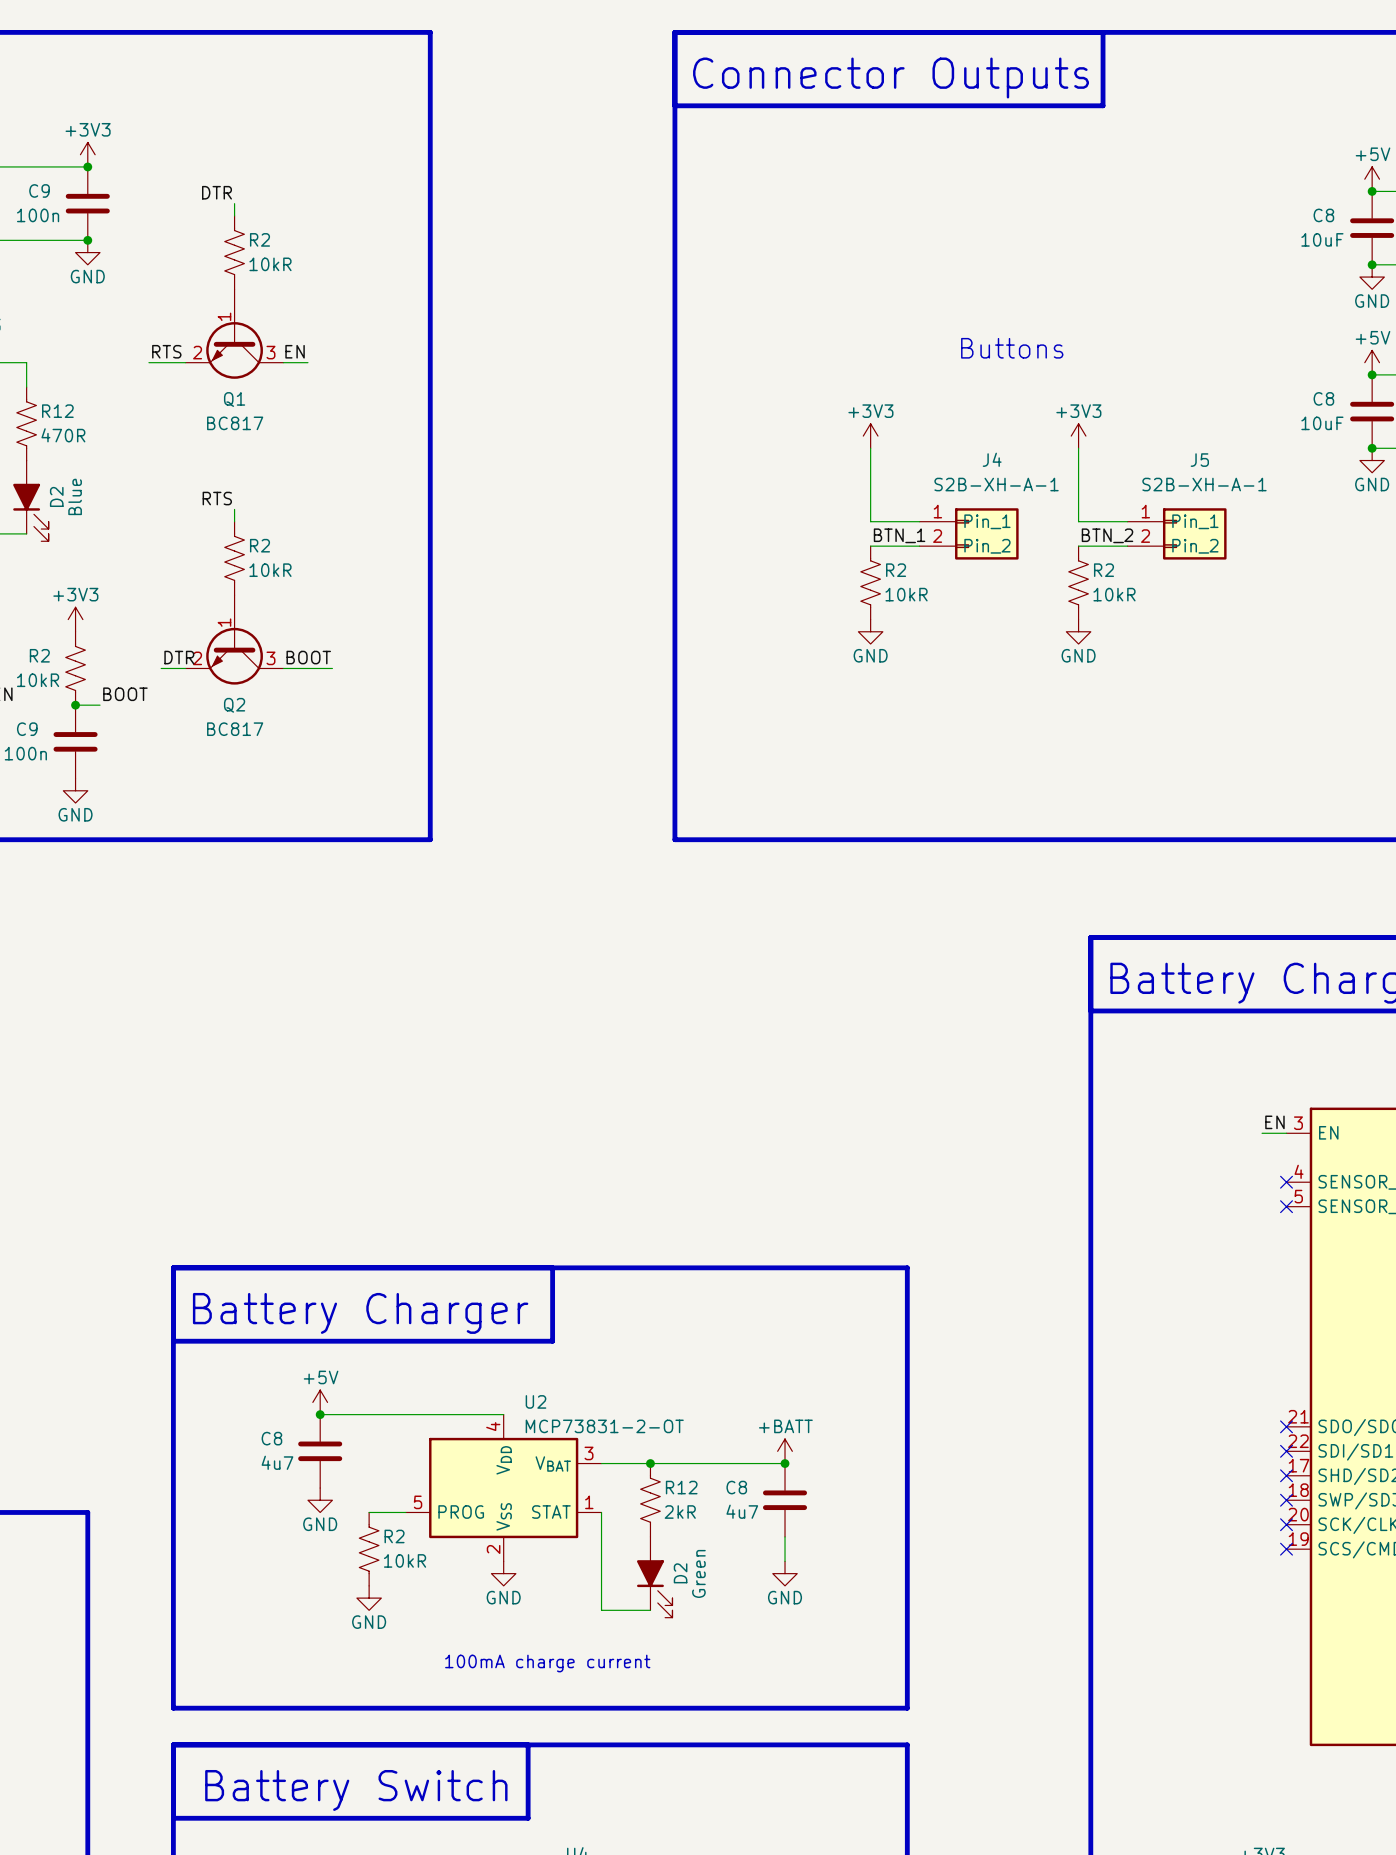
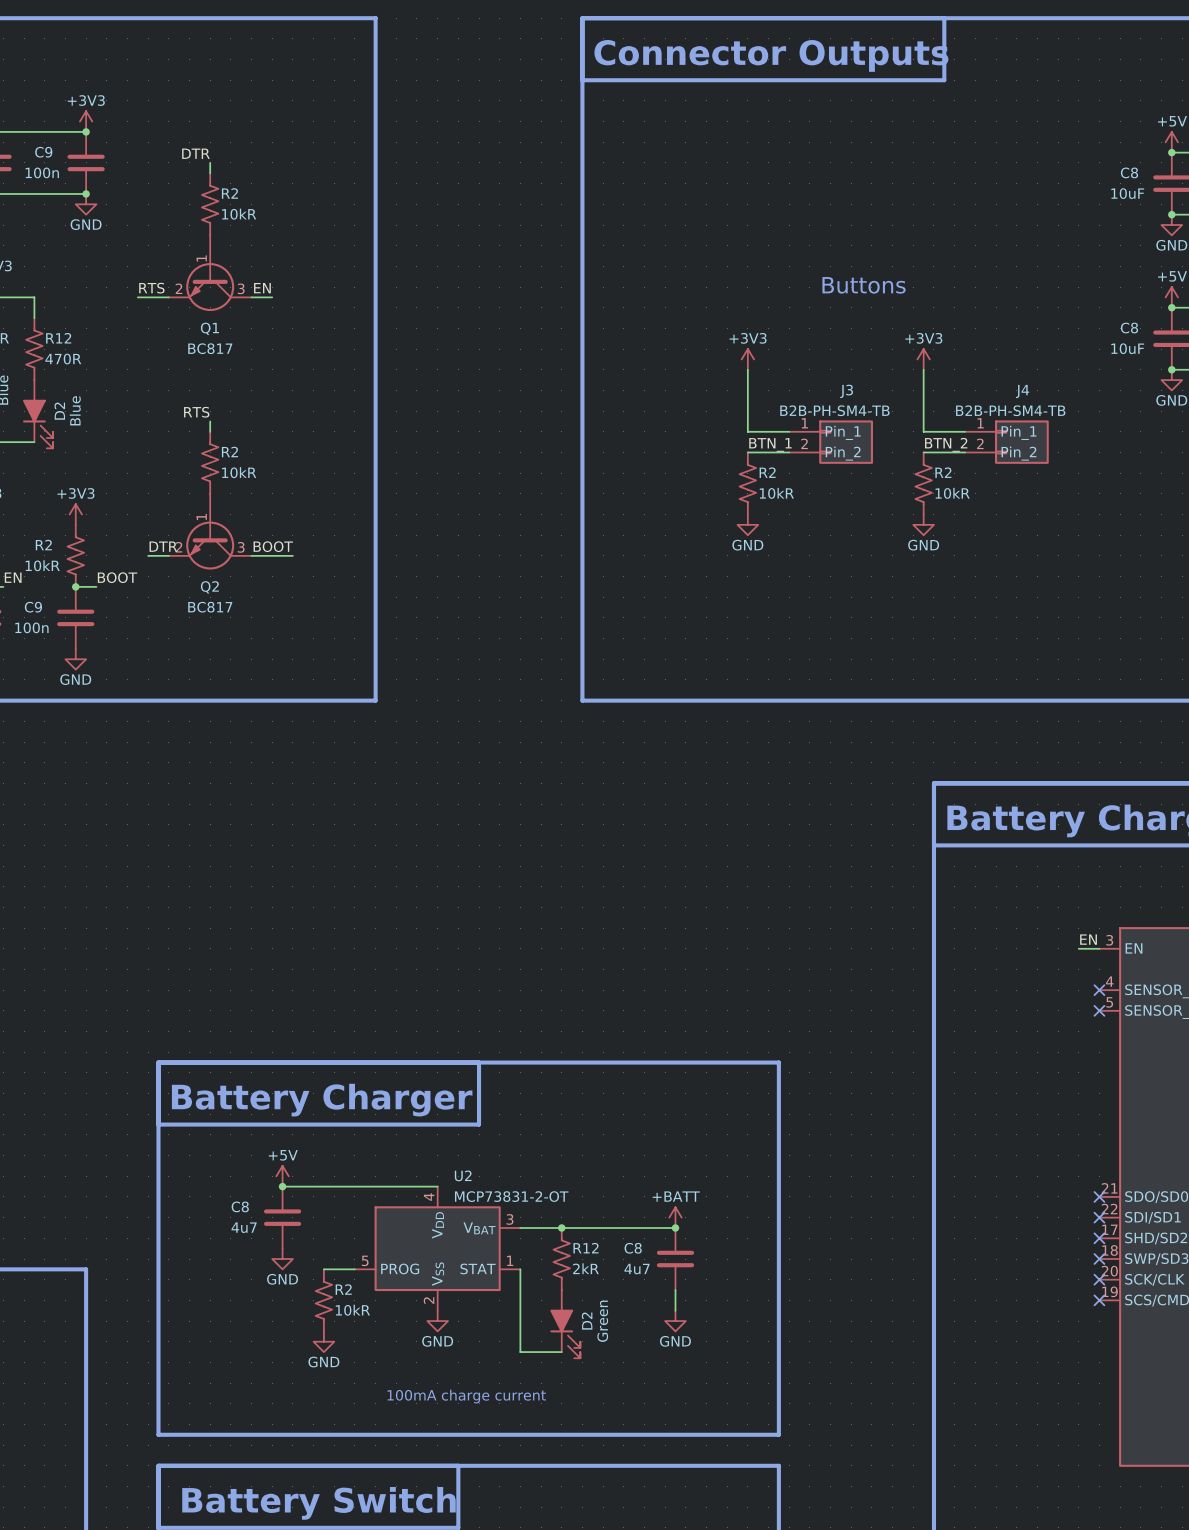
J4 name: J4 (992, 459) -> J3 (846, 391)
J5 name: J5 (1199, 460) -> J4 (1022, 391)
J4 value: S2B-XH-A-1 (996, 484) -> B2B-PH-SM4-TB (834, 410)
J5 value: S2B-XH-A-1 (1204, 484) -> B2B-PH-SM4-TB (1010, 410)

